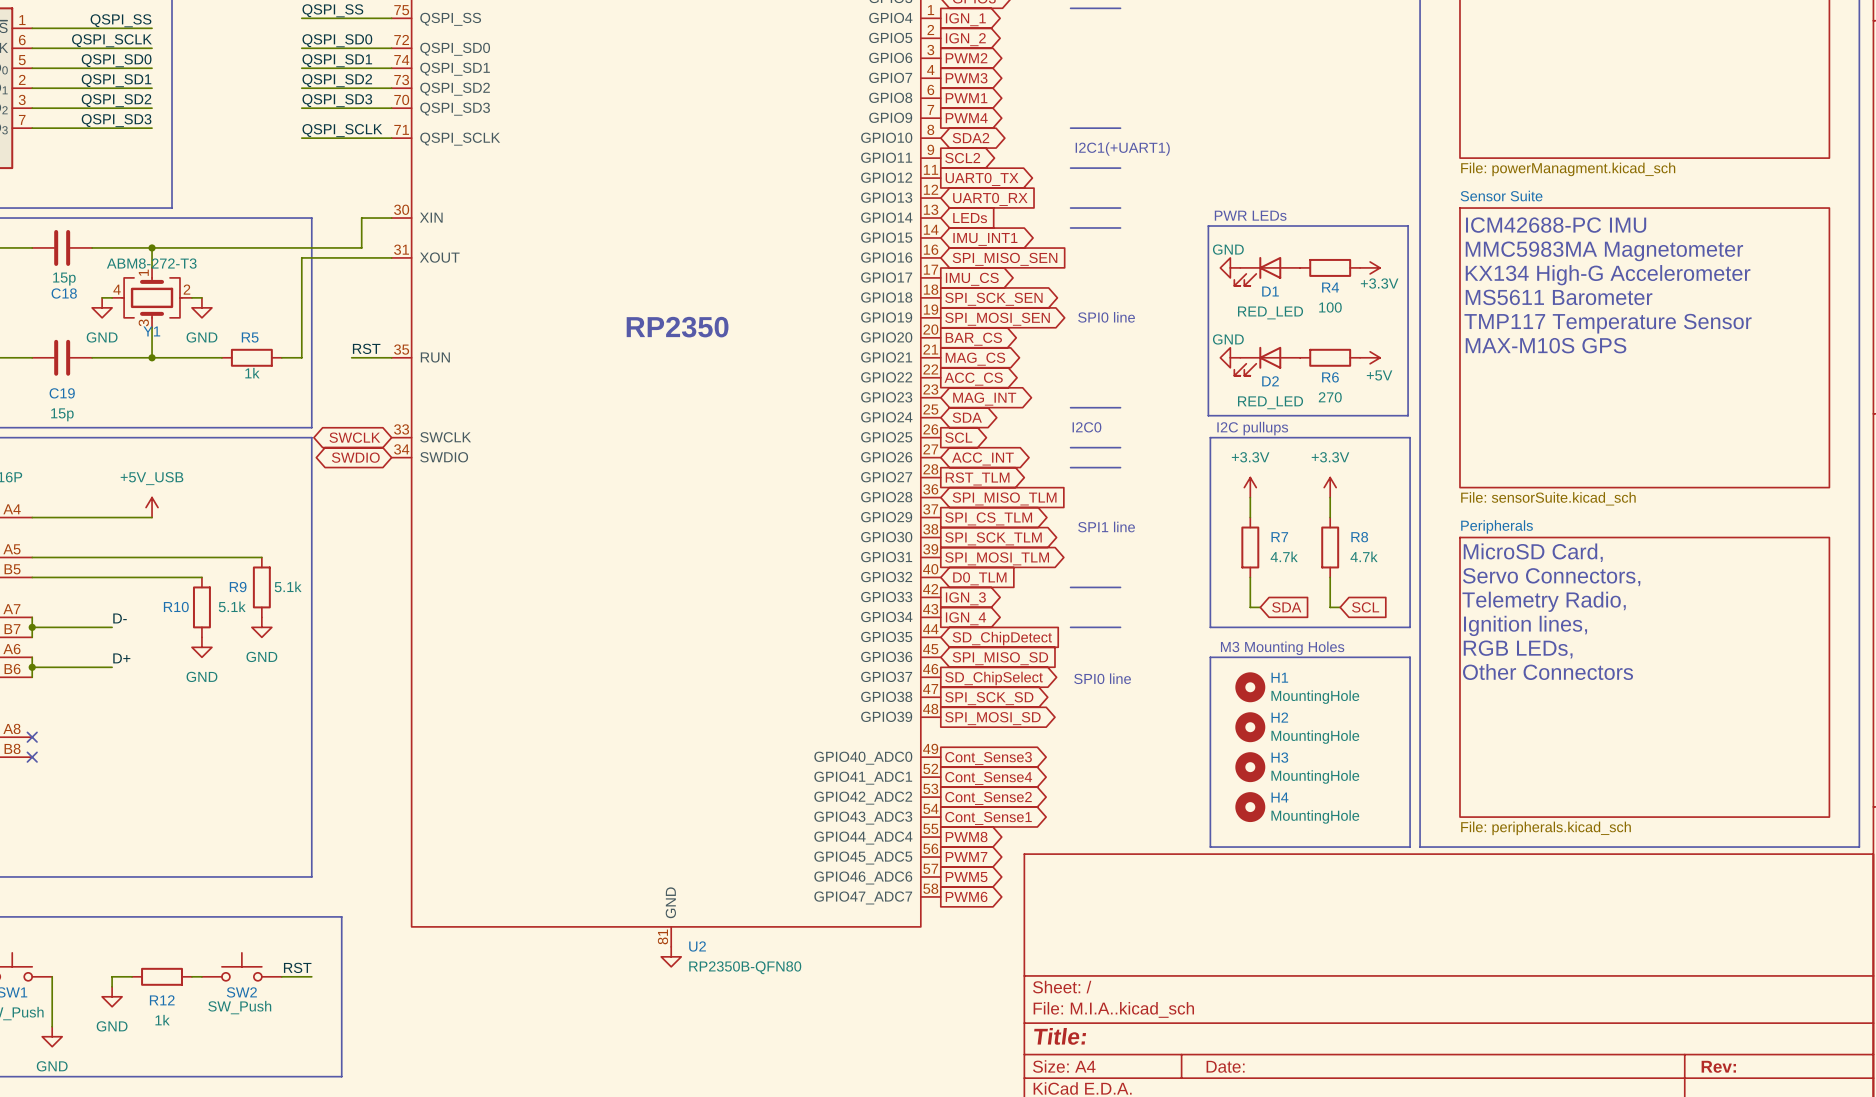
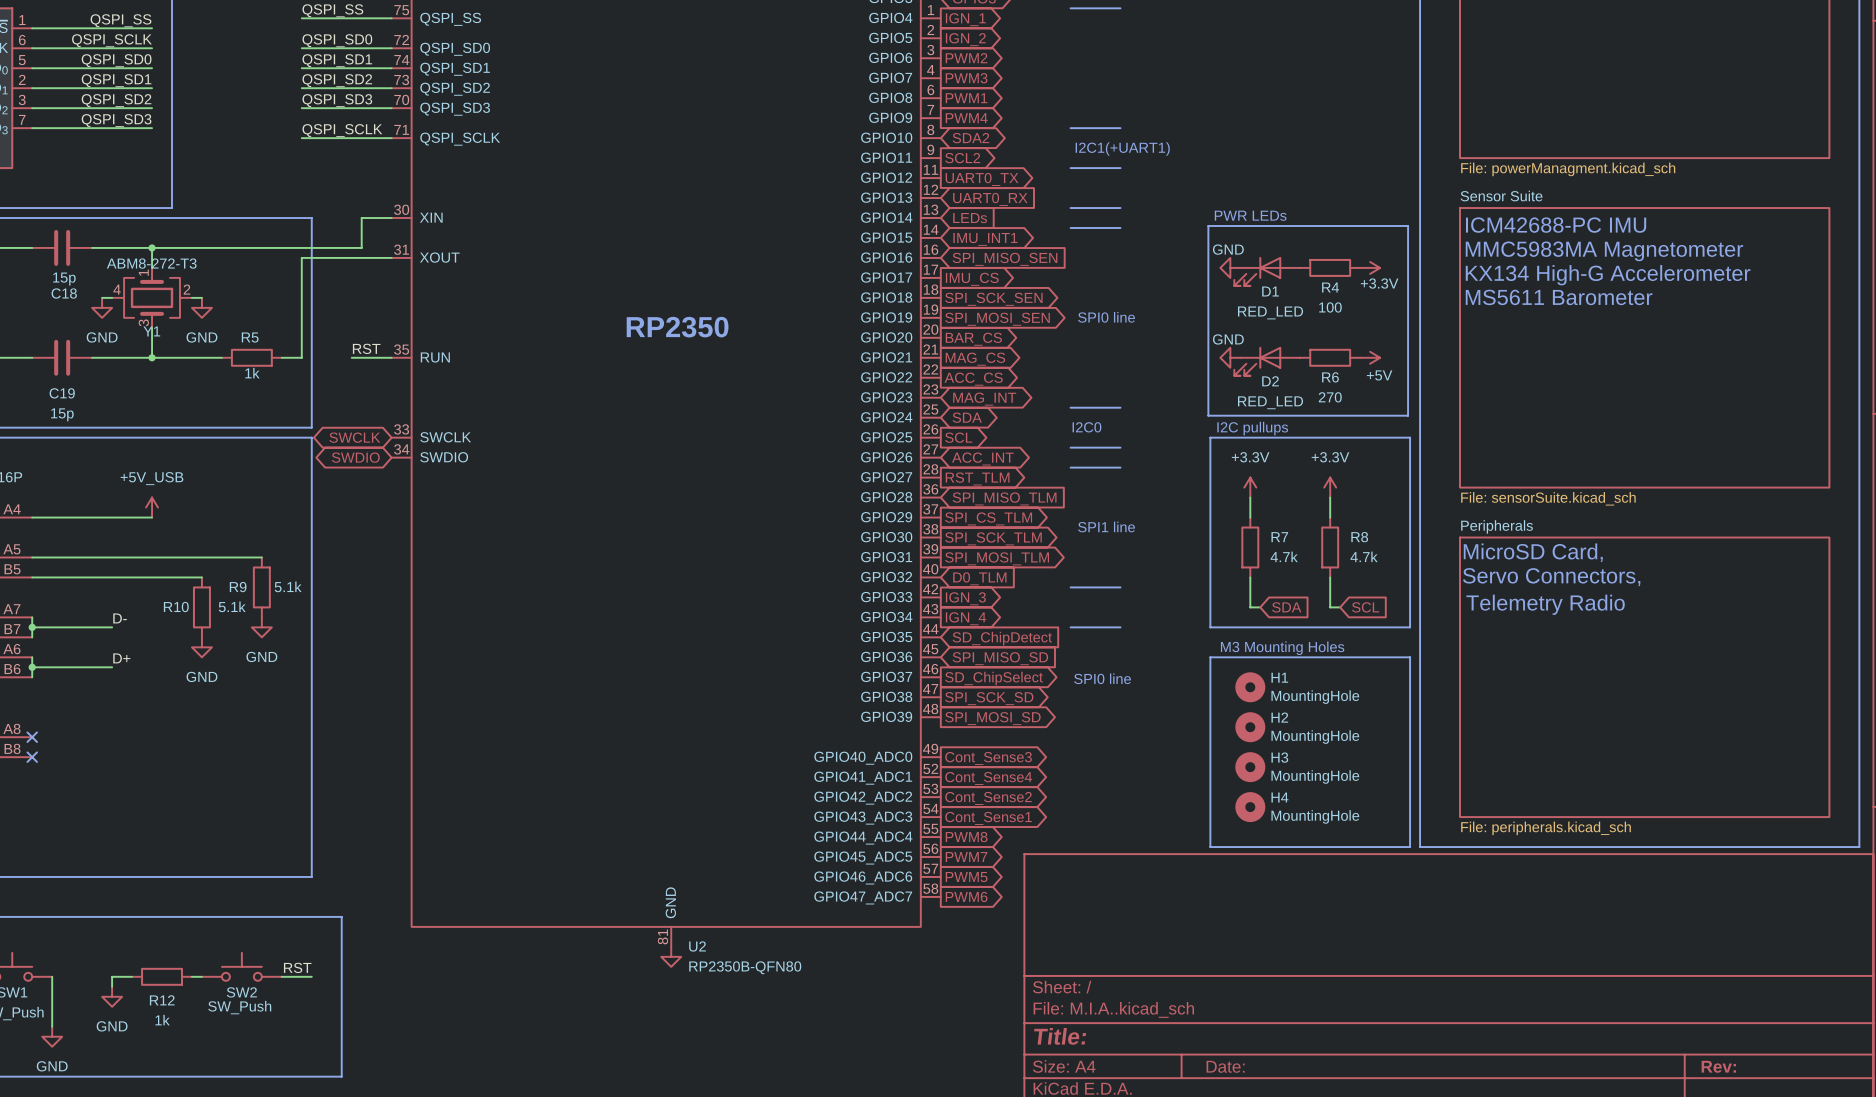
text: TMP117 Temperature Sensor (1608, 323) -> none
text: MAX-M10S GPS (1546, 345) -> none
text: Telemetry Radio, (1544, 601) -> Telemetry Radio (1545, 604)
text: Ignition lines, (1525, 625) -> none
text: RGB LEDs, (1518, 649) -> none
text: Other Connectors (1548, 672) -> none

